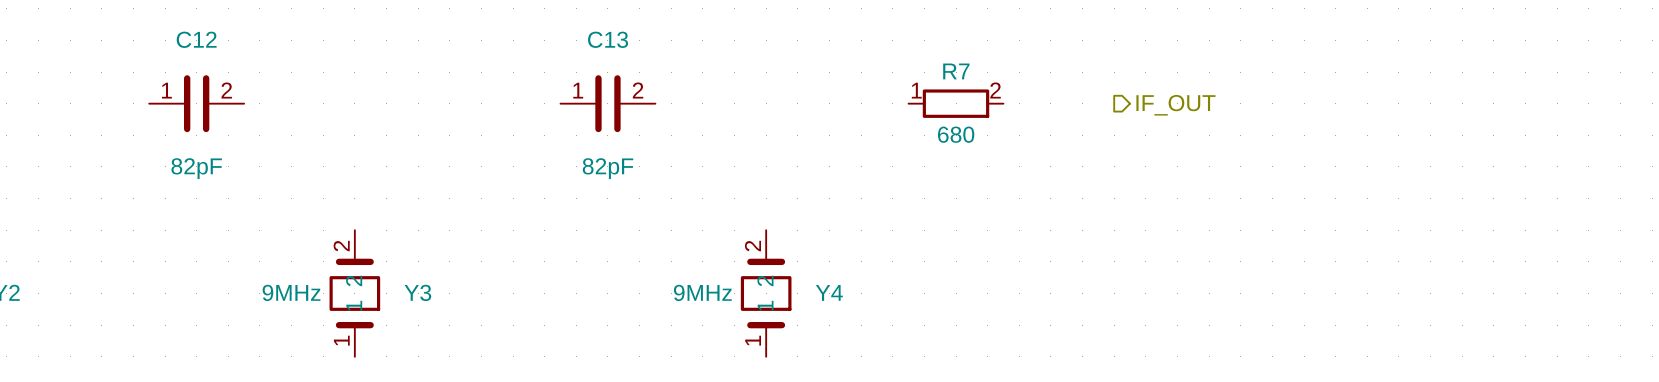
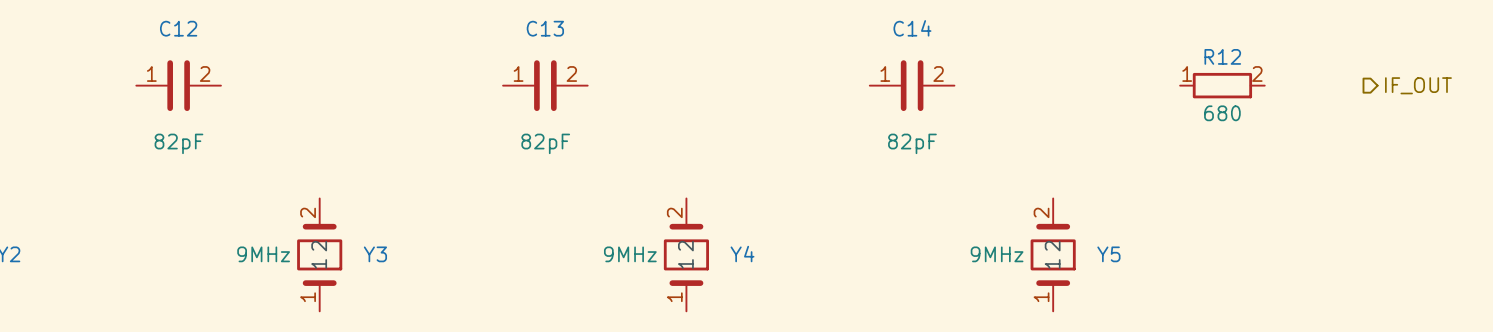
R7: 680 (956, 103) -> none
C14: none -> 82pF (912, 85)
R12: none -> 680 (1222, 85)
hierarchical label: IF_OUT (1175, 105) -> none
hierarchical label: none -> IF_OUT (1418, 85)
Y5: none -> 9MHz (1053, 254)

